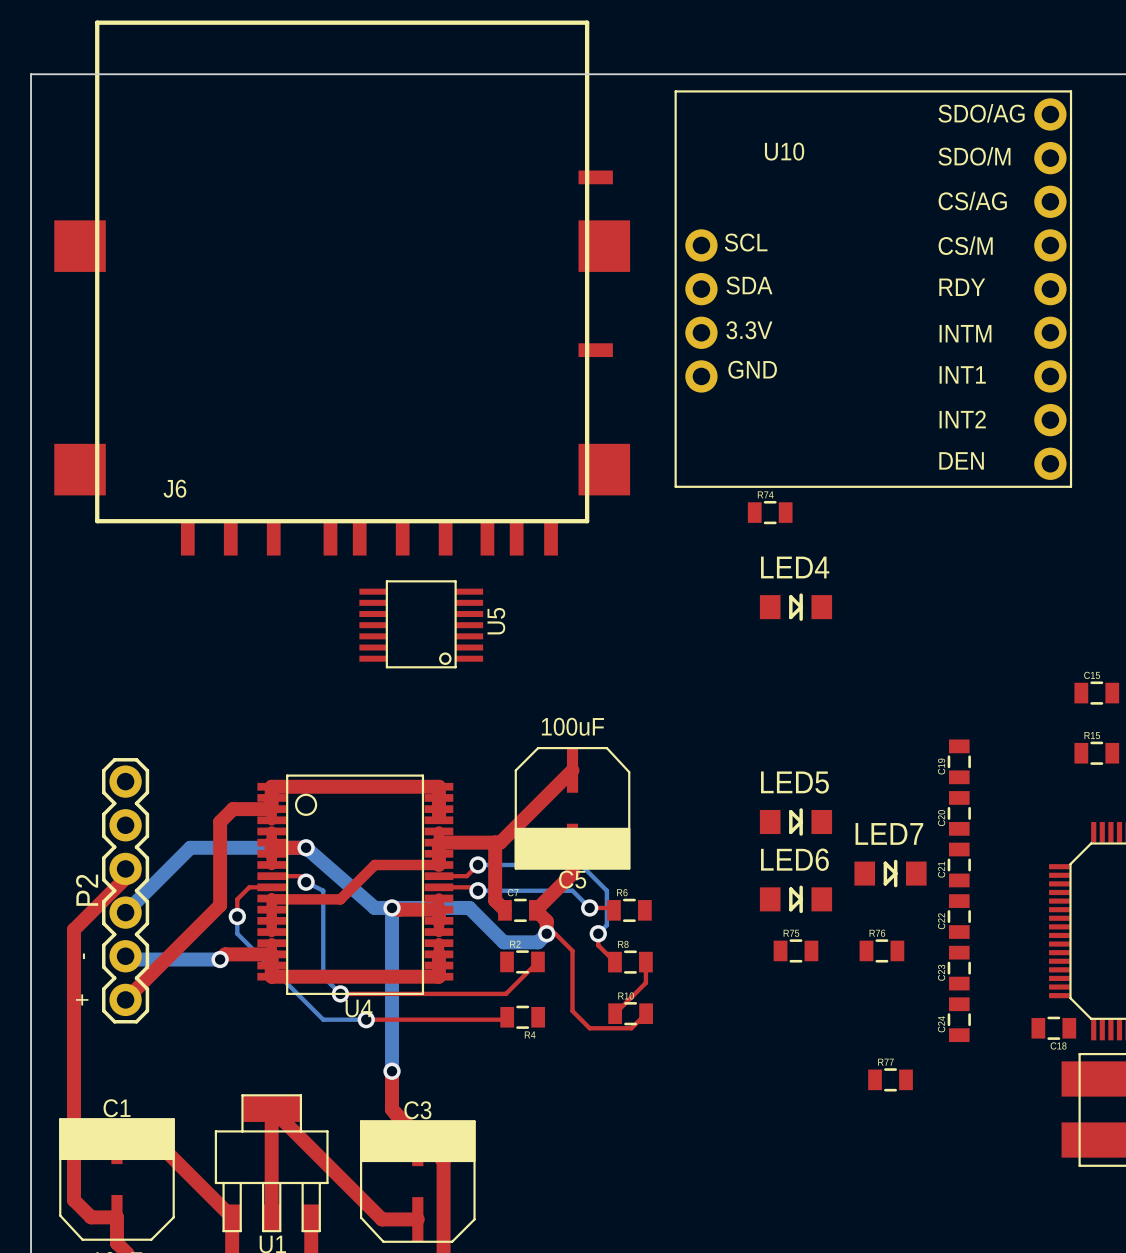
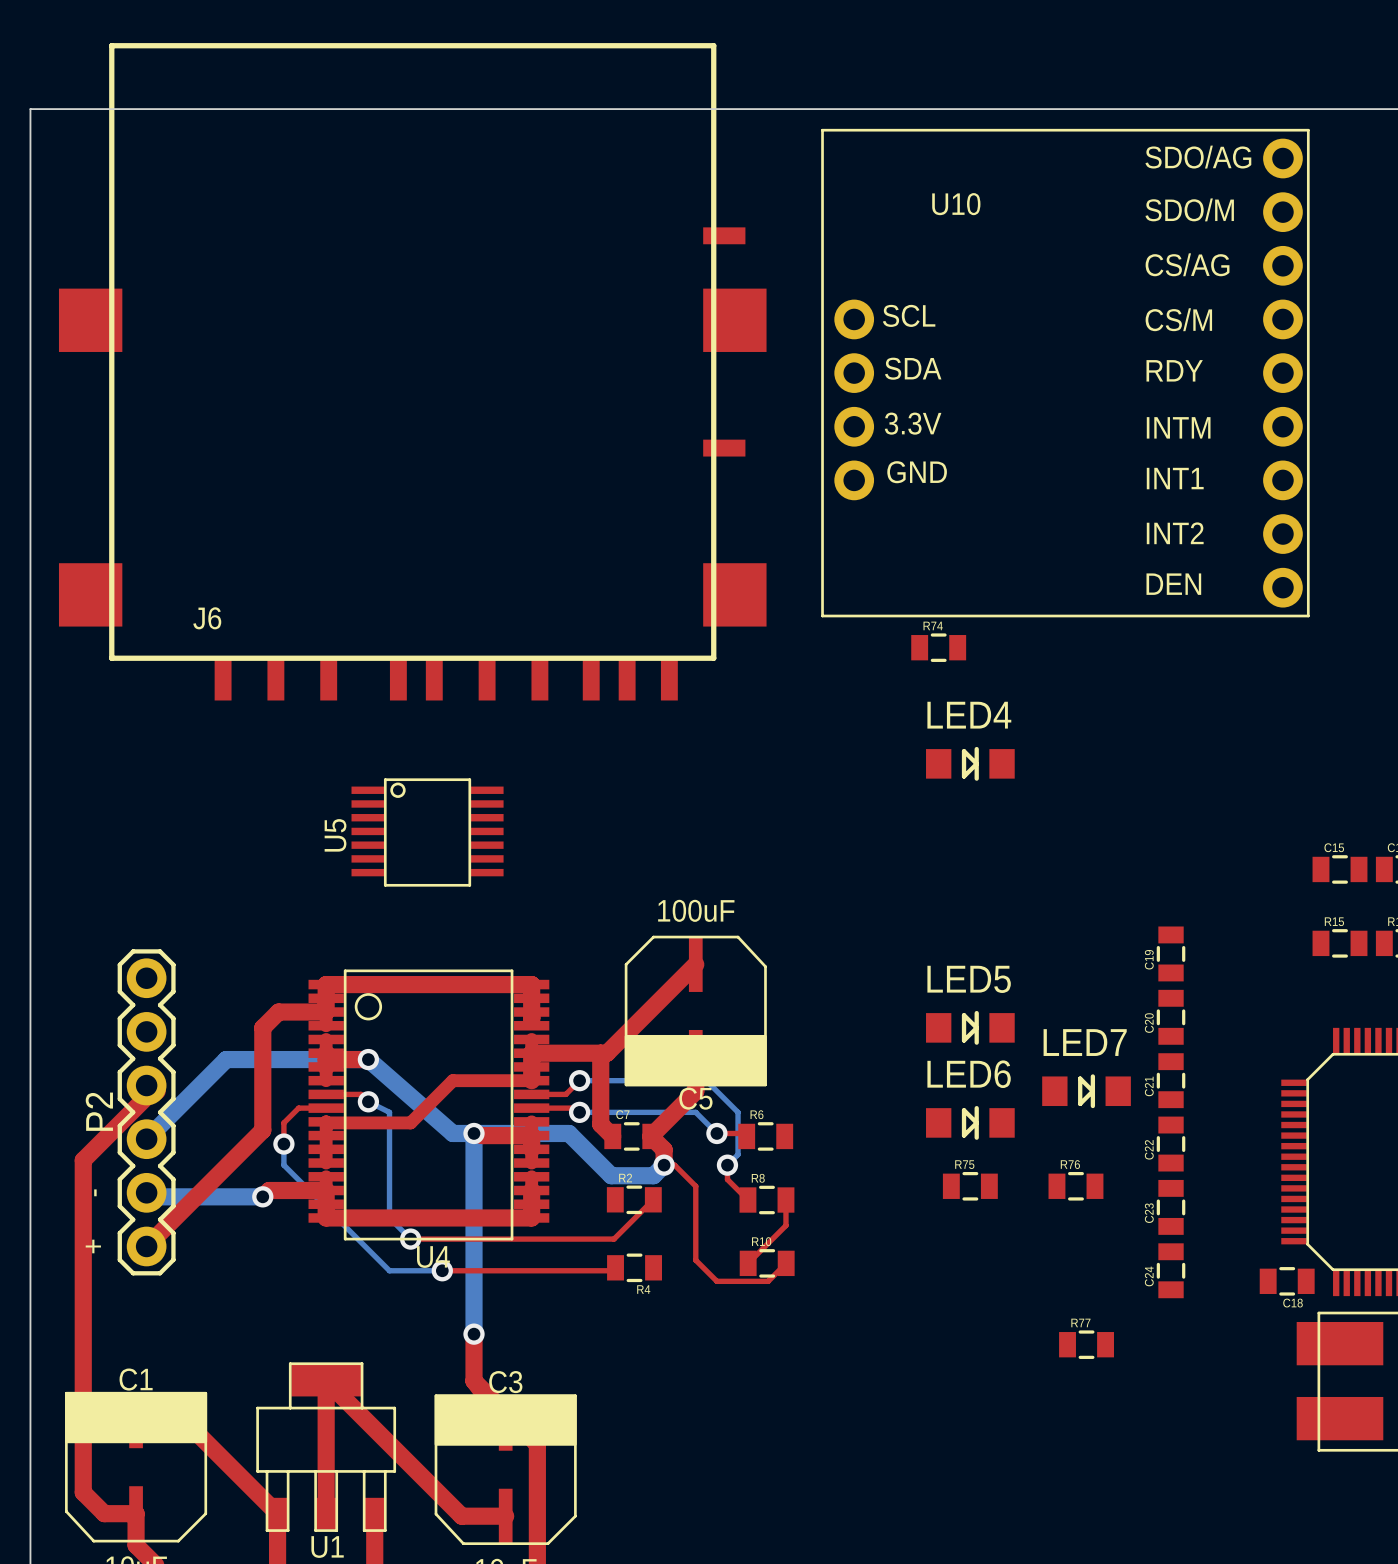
U5 rotation: 0° (421, 624) -> 180° (427, 832)
U5 position: (421, 624) -> (427, 832)

